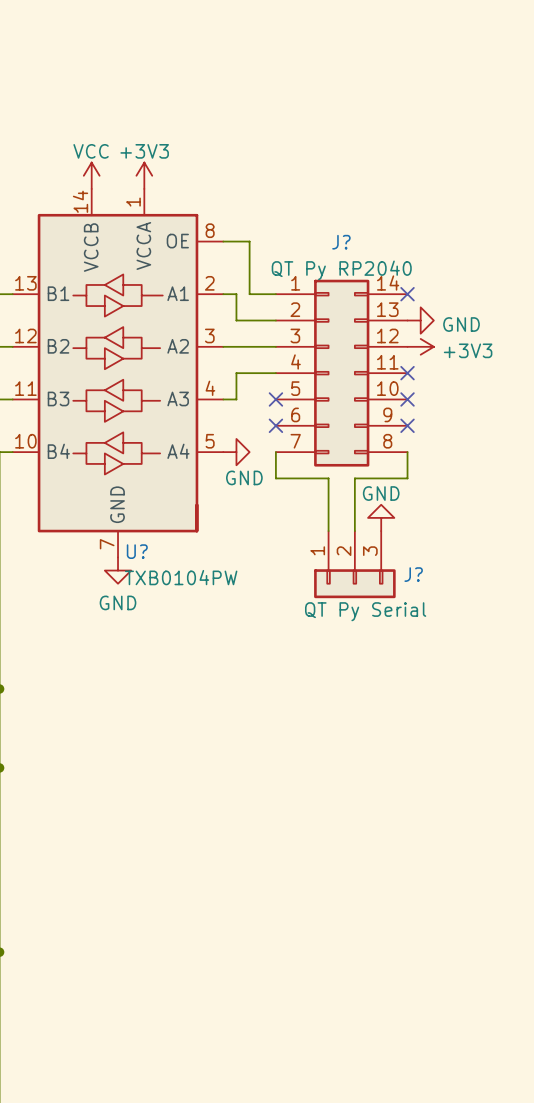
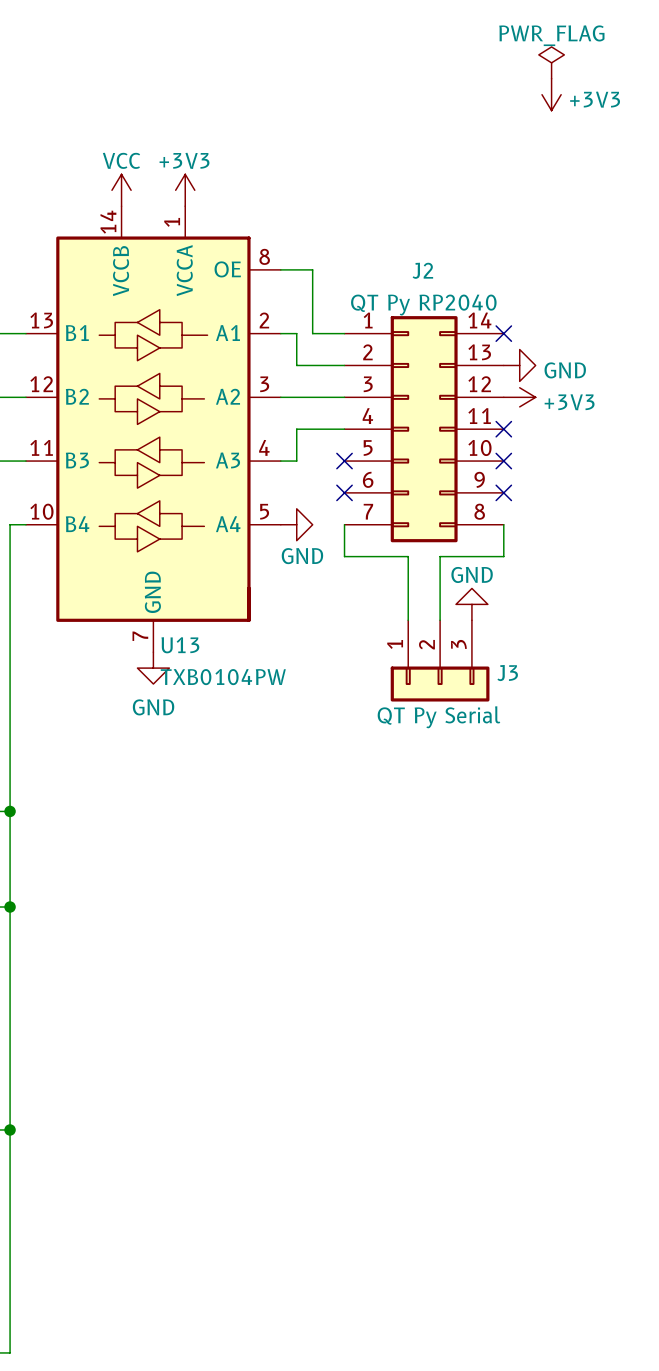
power symbol: none -> PWR_FLAG (551, 62)
power symbol: none -> +3V3 (551, 94)
J? name: J? (341, 242) -> J2 (422, 270)
U? name: U? (137, 551) -> U13 (180, 645)
J? name: J? (413, 574) -> J3 (507, 673)

